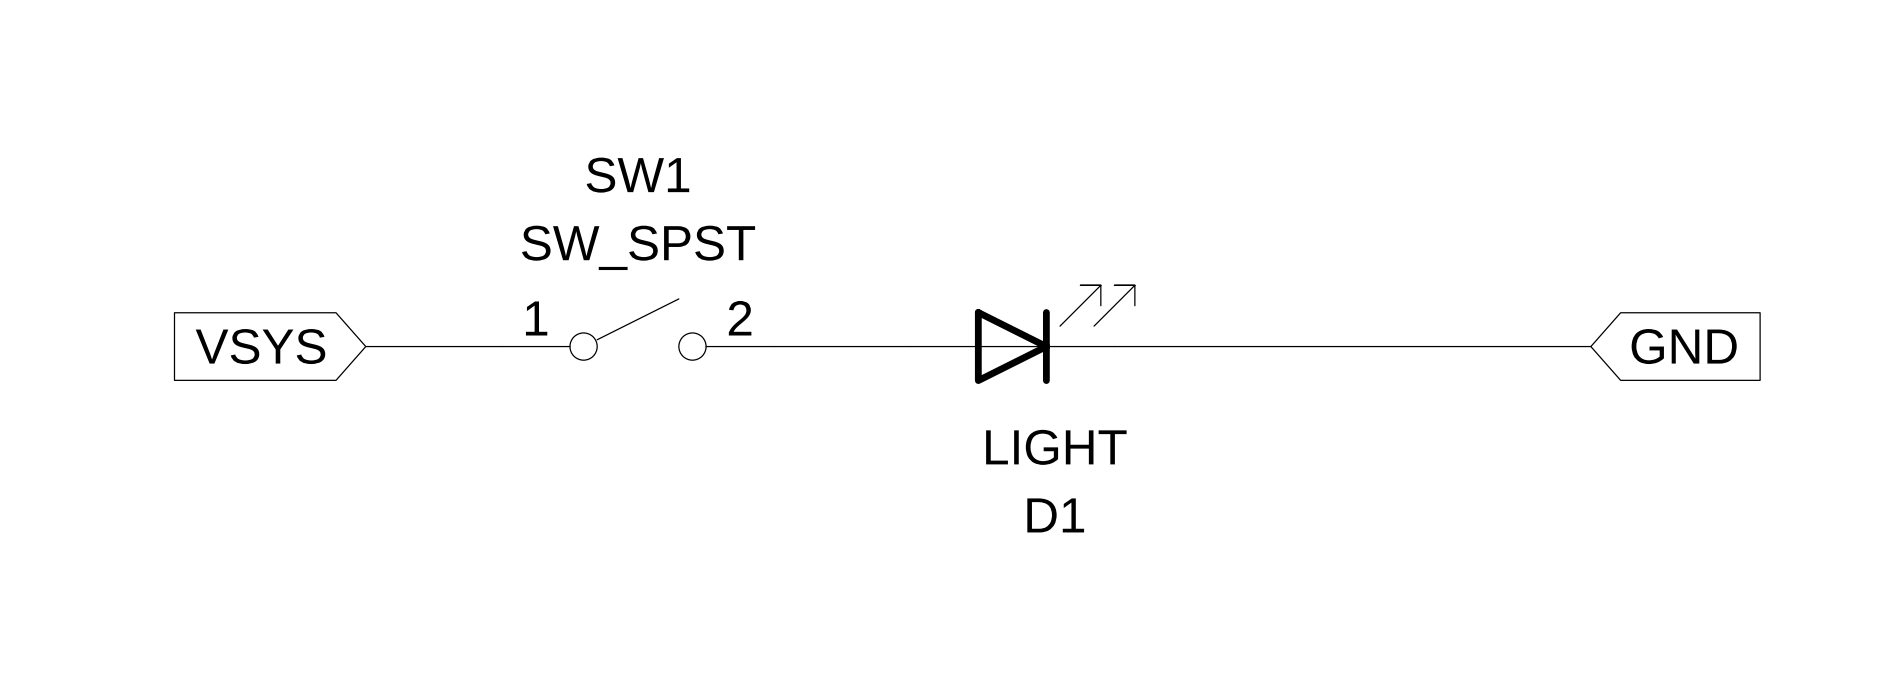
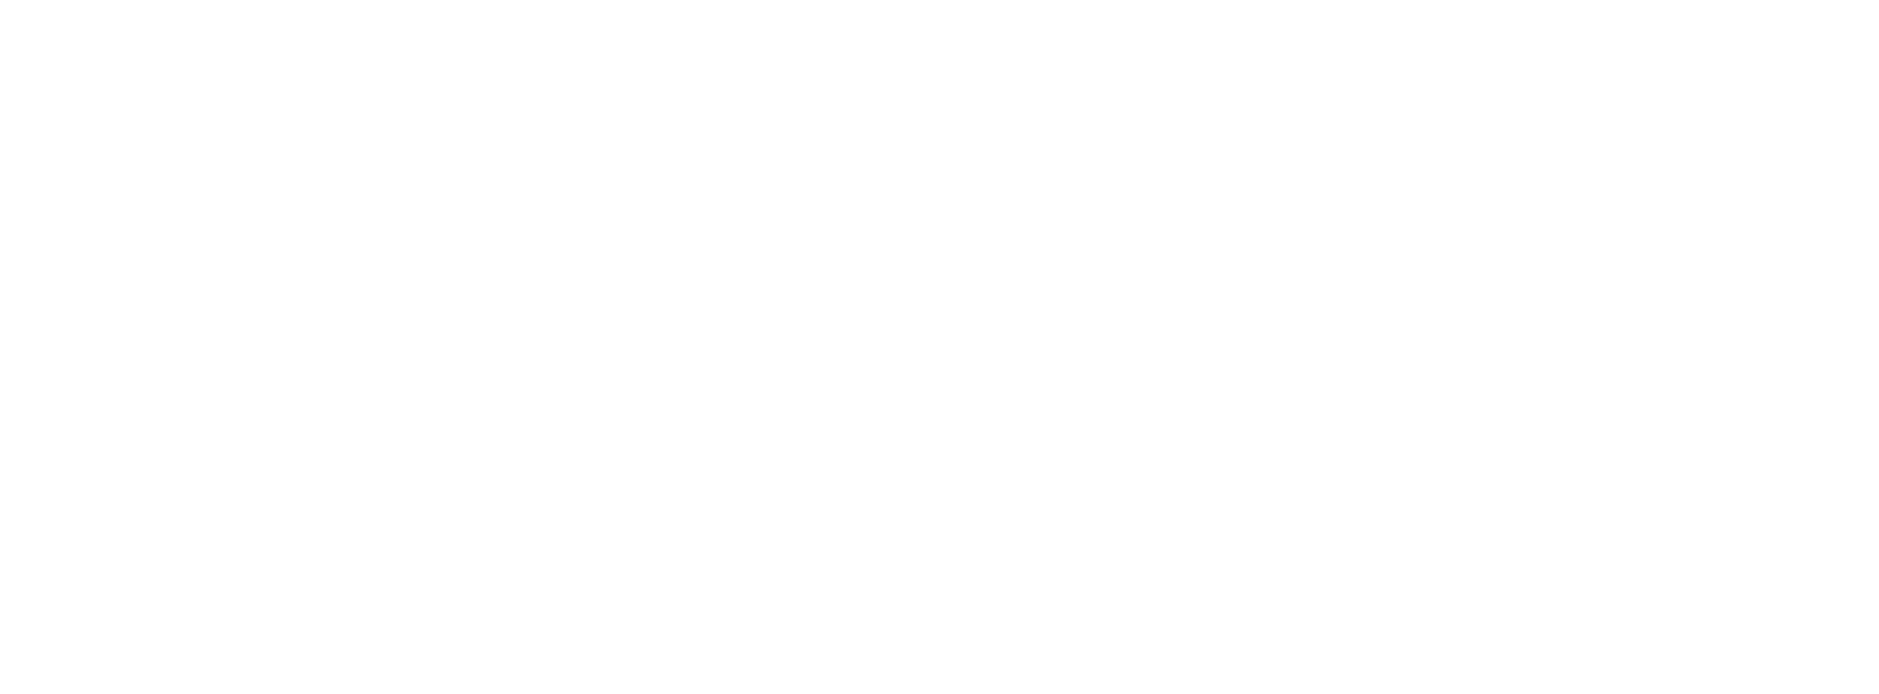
SW1: SW_SPST (638, 329) -> none
D1: LIGHT (1022, 334) -> none
global label: VSYS (260, 346) -> none
wire: (365, 346) (501, 346) -> none
wire: (774, 346) (910, 346) -> none
wire: (1114, 346) (1590, 346) -> none
global label: GND (1684, 346) -> none

